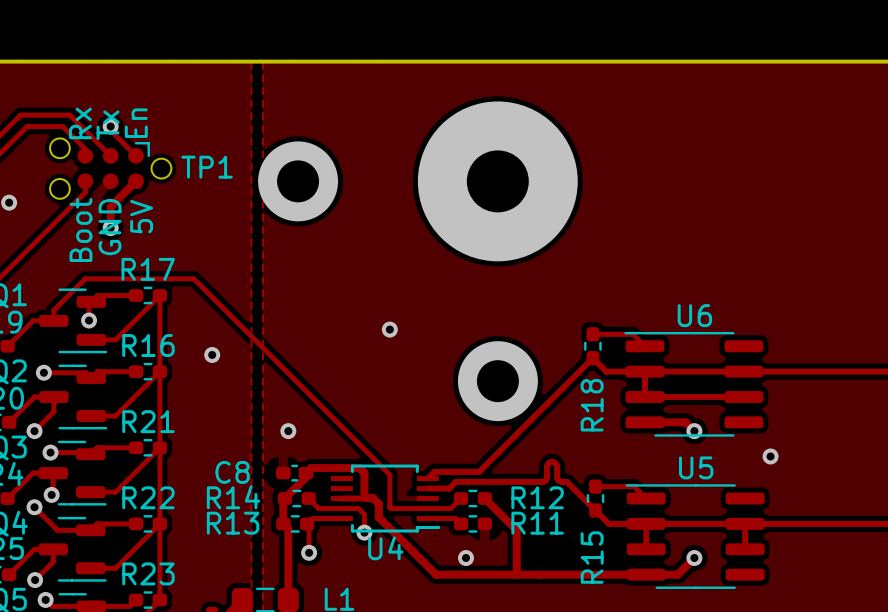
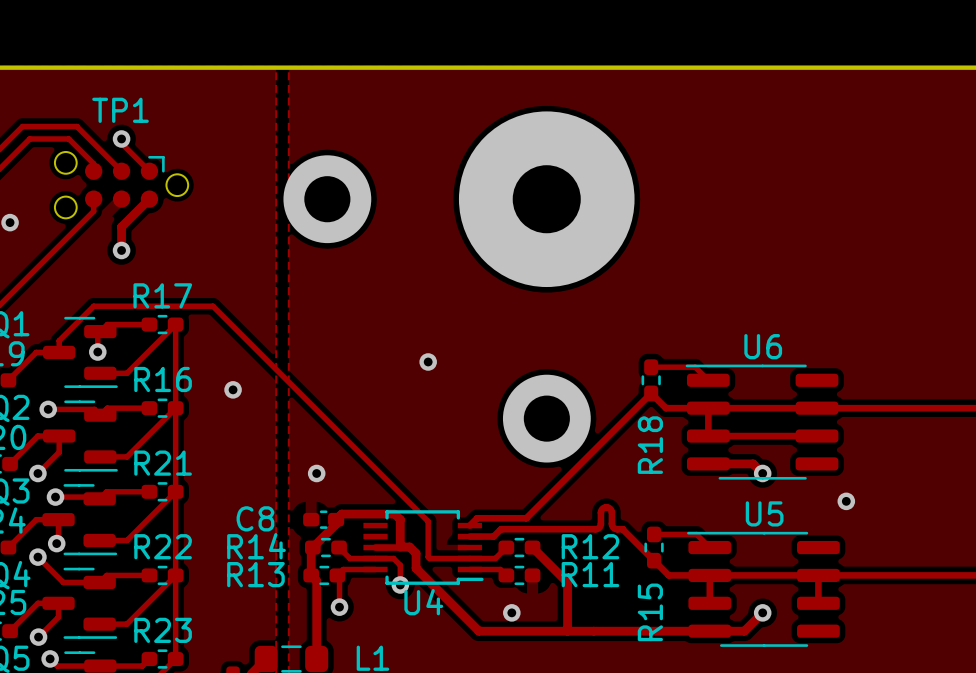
text: Rx (80, 123) -> none
text: En (136, 123) -> none
text: Tx (108, 125) -> none
TP1 name position: TP1 (207, 167) -> TP1 (120, 110)
text: 5V (141, 216) -> none
text: GND (110, 227) -> none
text: Boot (80, 230) -> none

